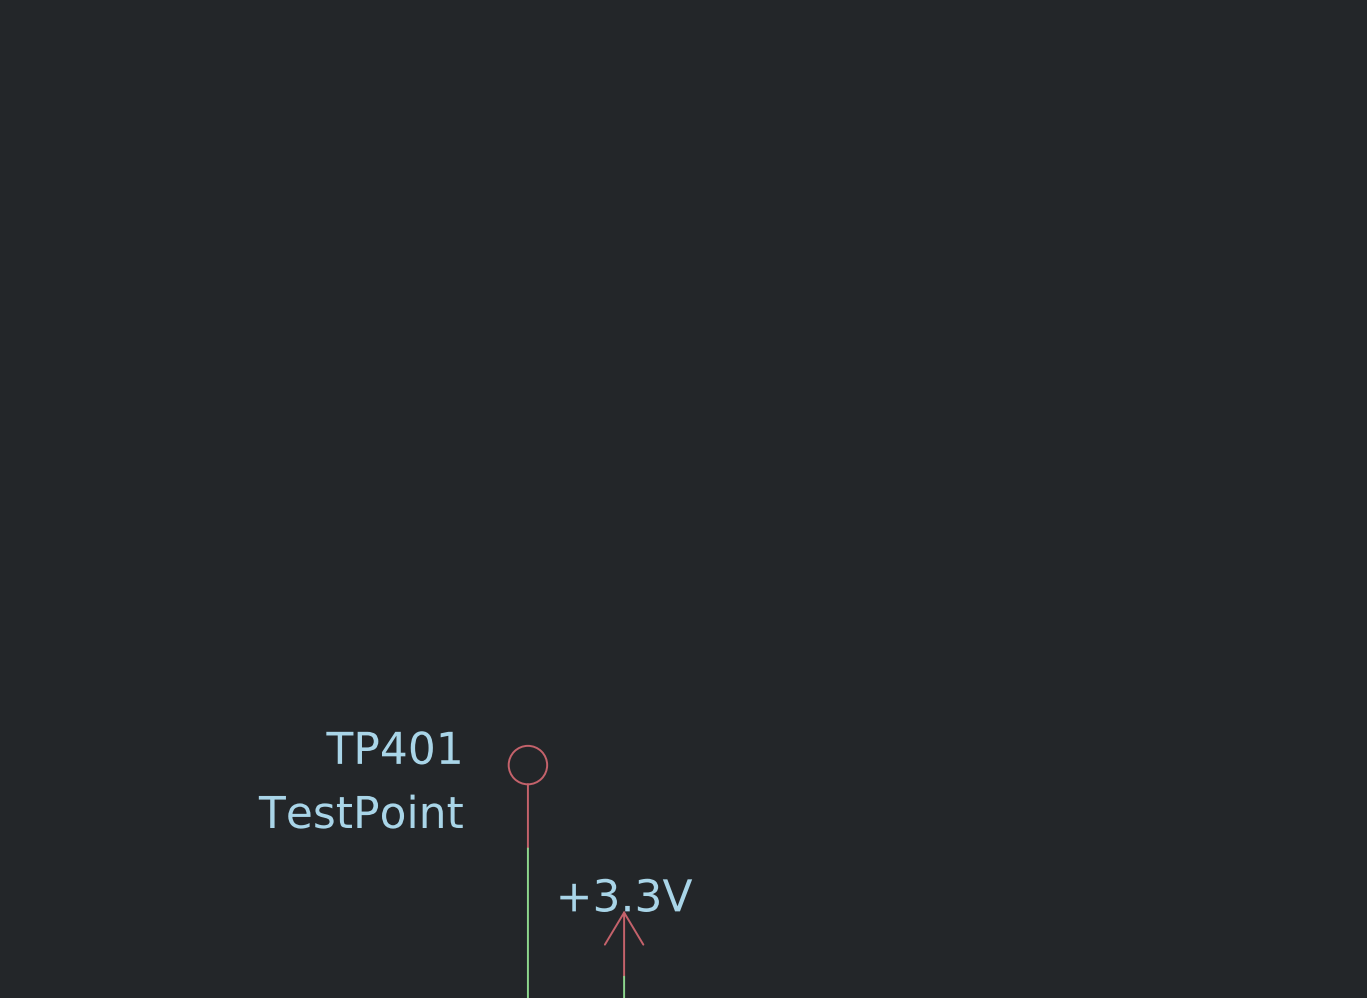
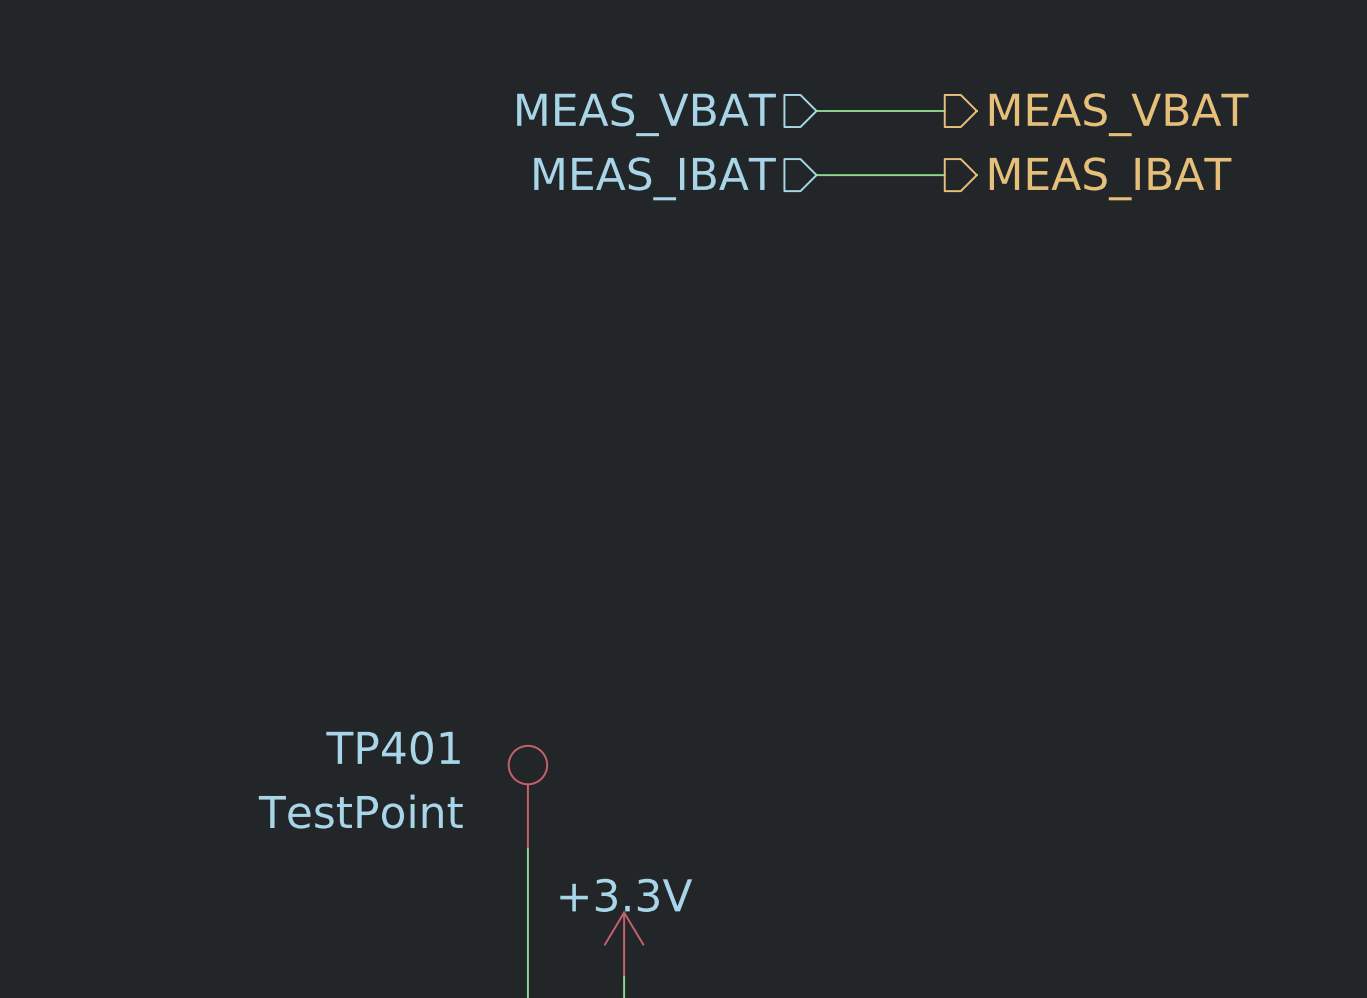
wire: none -> (816, 110) (944, 110)
sheet pin: none -> MEAS_VBAT (646, 114)
hierarchical label: none -> MEAS_VBAT (1119, 114)
wire: none -> (816, 175) (944, 175)
sheet pin: none -> MEAS_IBAT (655, 178)
hierarchical label: none -> MEAS_IBAT (1110, 178)

